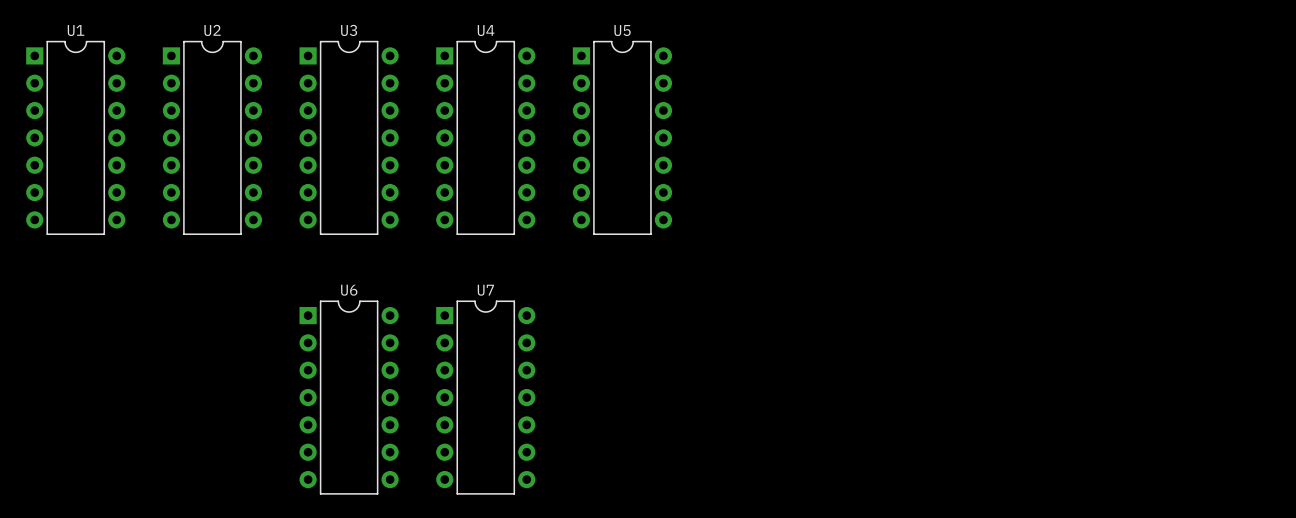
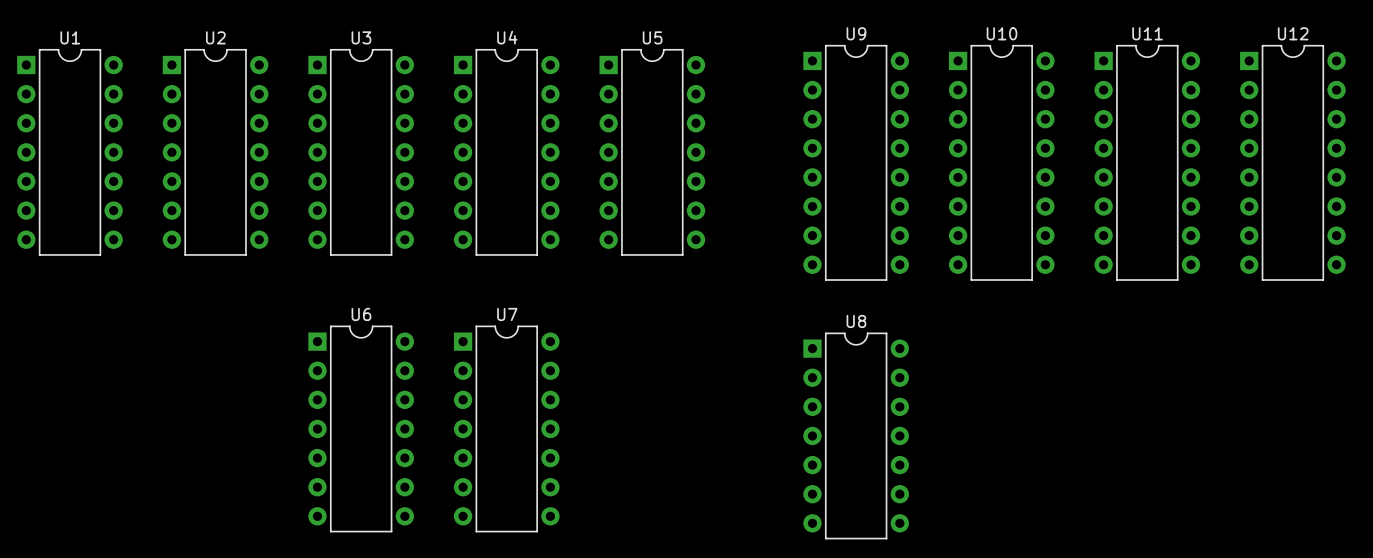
U9: none -> (856, 162)
U10: none -> (1001, 162)
U11: none -> (1147, 162)
U12: none -> (1292, 162)
U8: none -> (856, 435)

